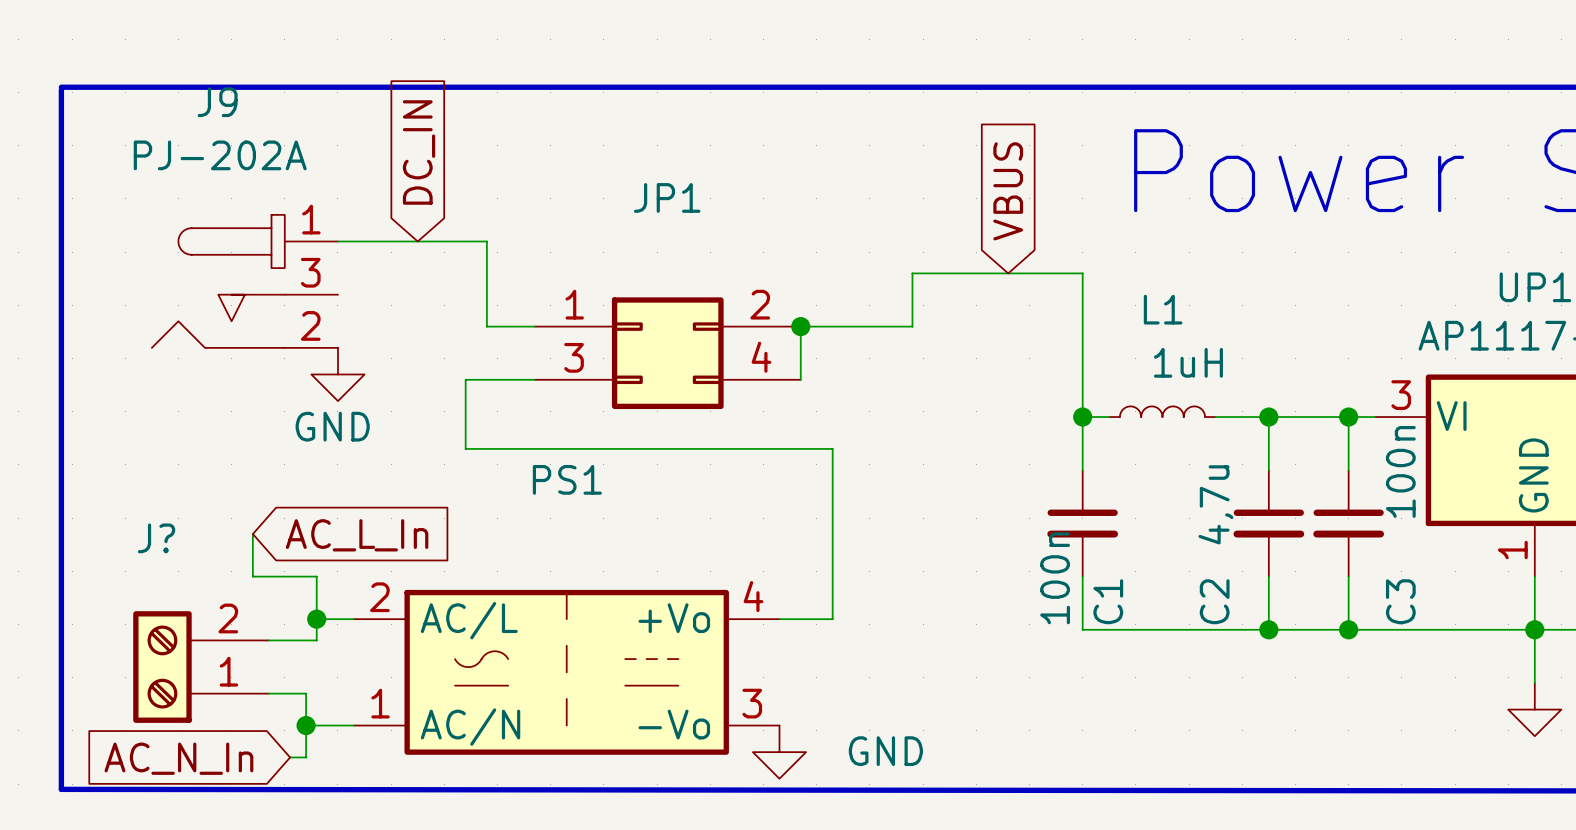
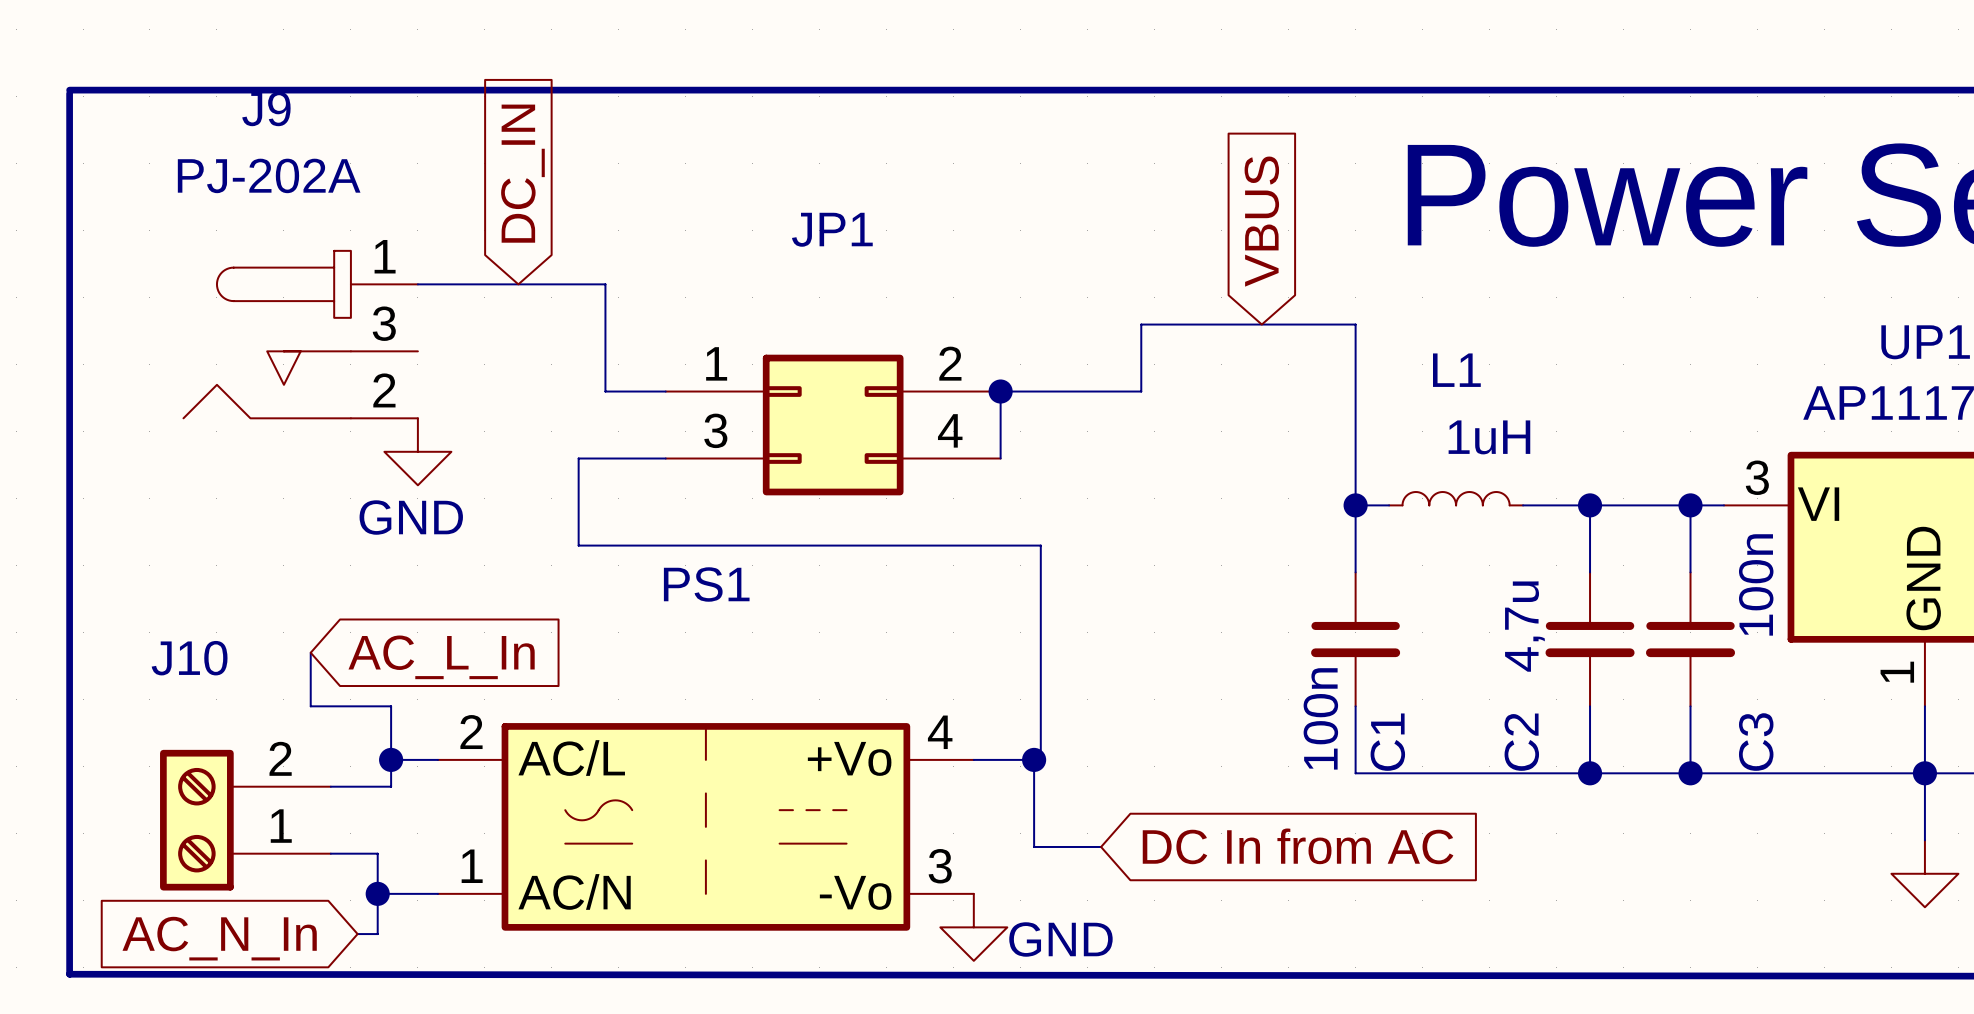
J? name: J? (156, 538) -> J10 (189, 658)
wire: none -> (1034, 759) (1034, 846) (1101, 846)
junction: none -> (1034, 759)
global label: none -> DC In from AC (1298, 846)
power symbol text position: GND (885, 751) -> GND (1060, 939)

